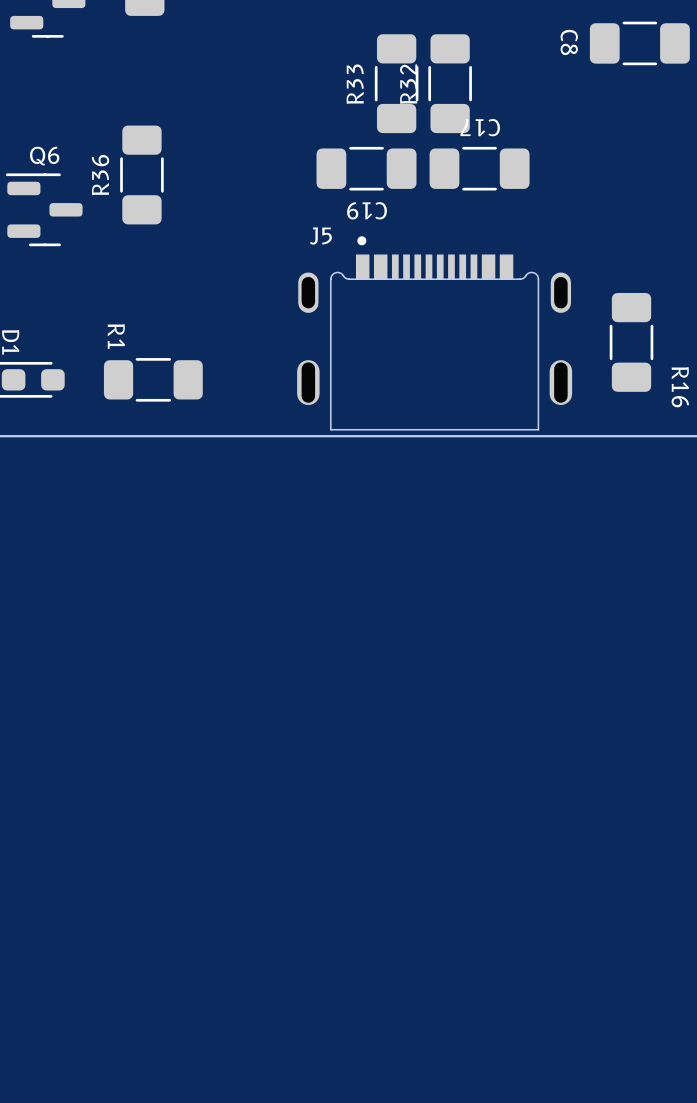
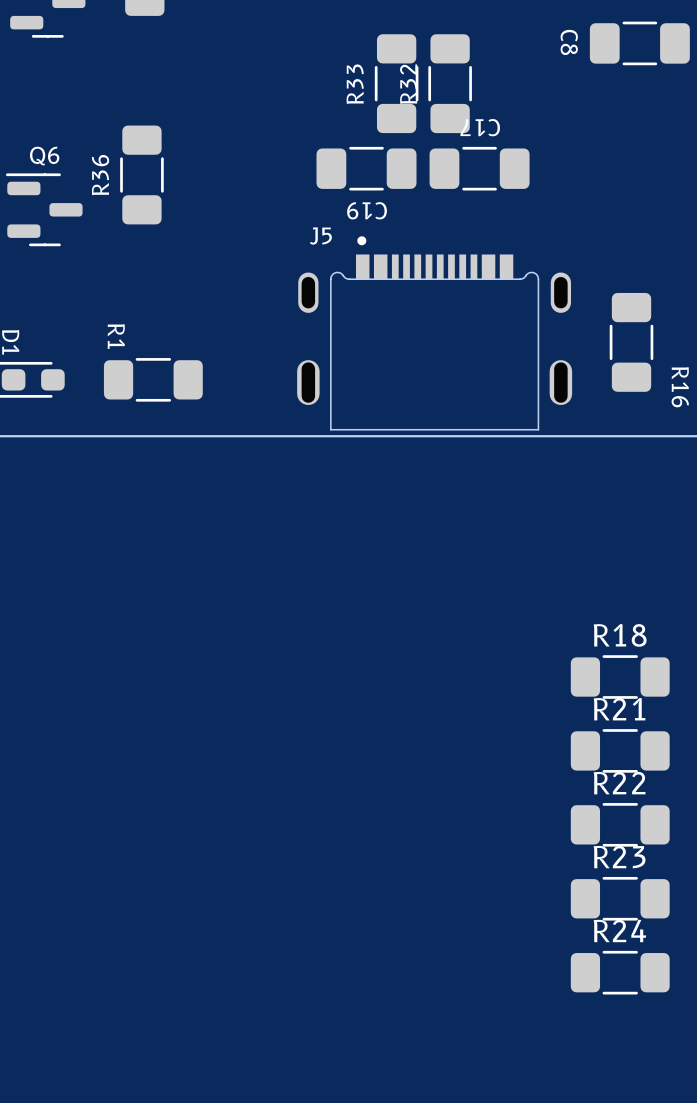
R18: none -> (620, 677)
R21: none -> (620, 750)
R22: none -> (620, 824)
R23: none -> (620, 898)
R24: none -> (620, 972)

